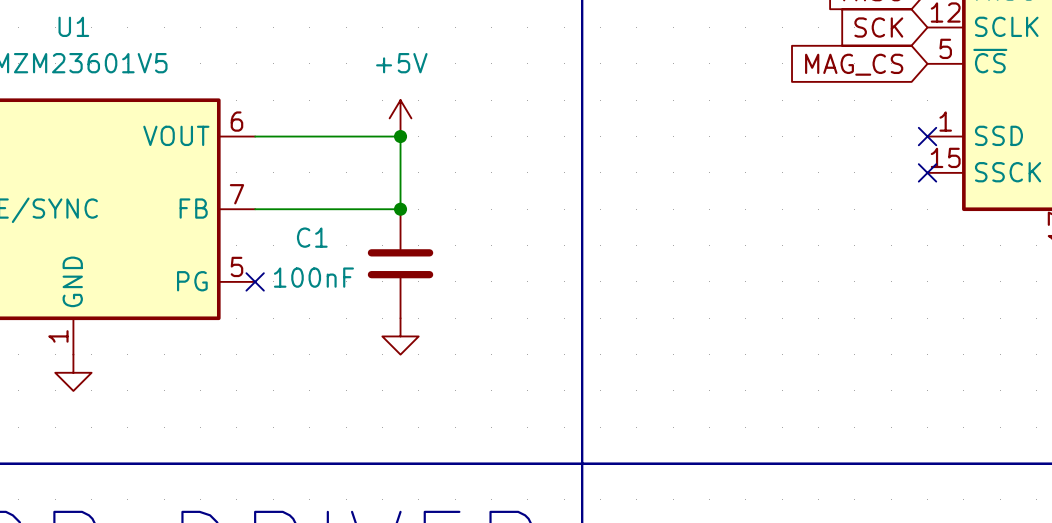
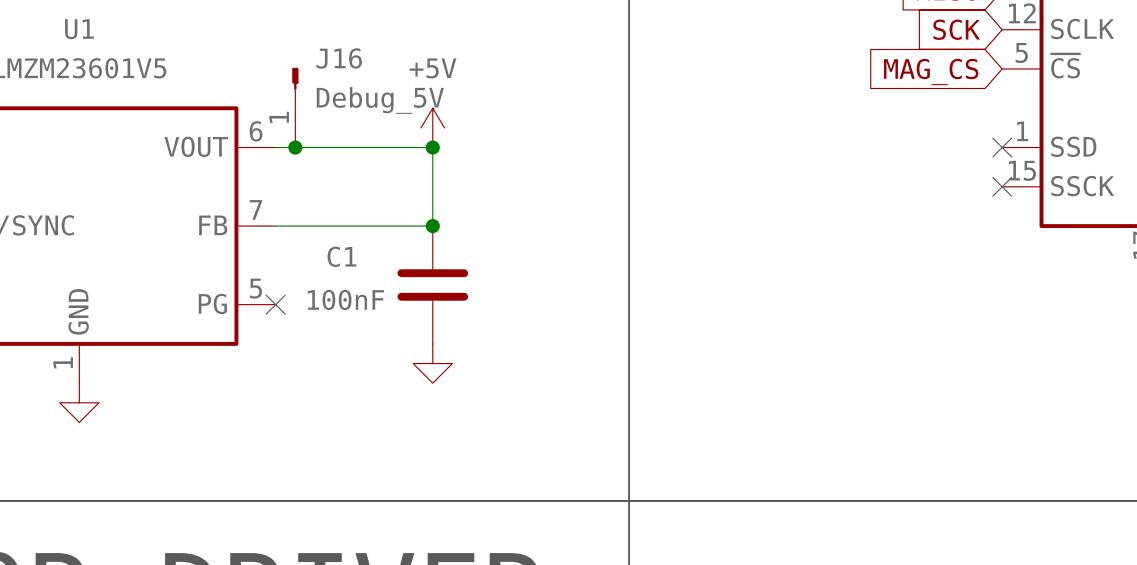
J16: none -> Debug_5V (295, 107)
junction: none -> (295, 147)

